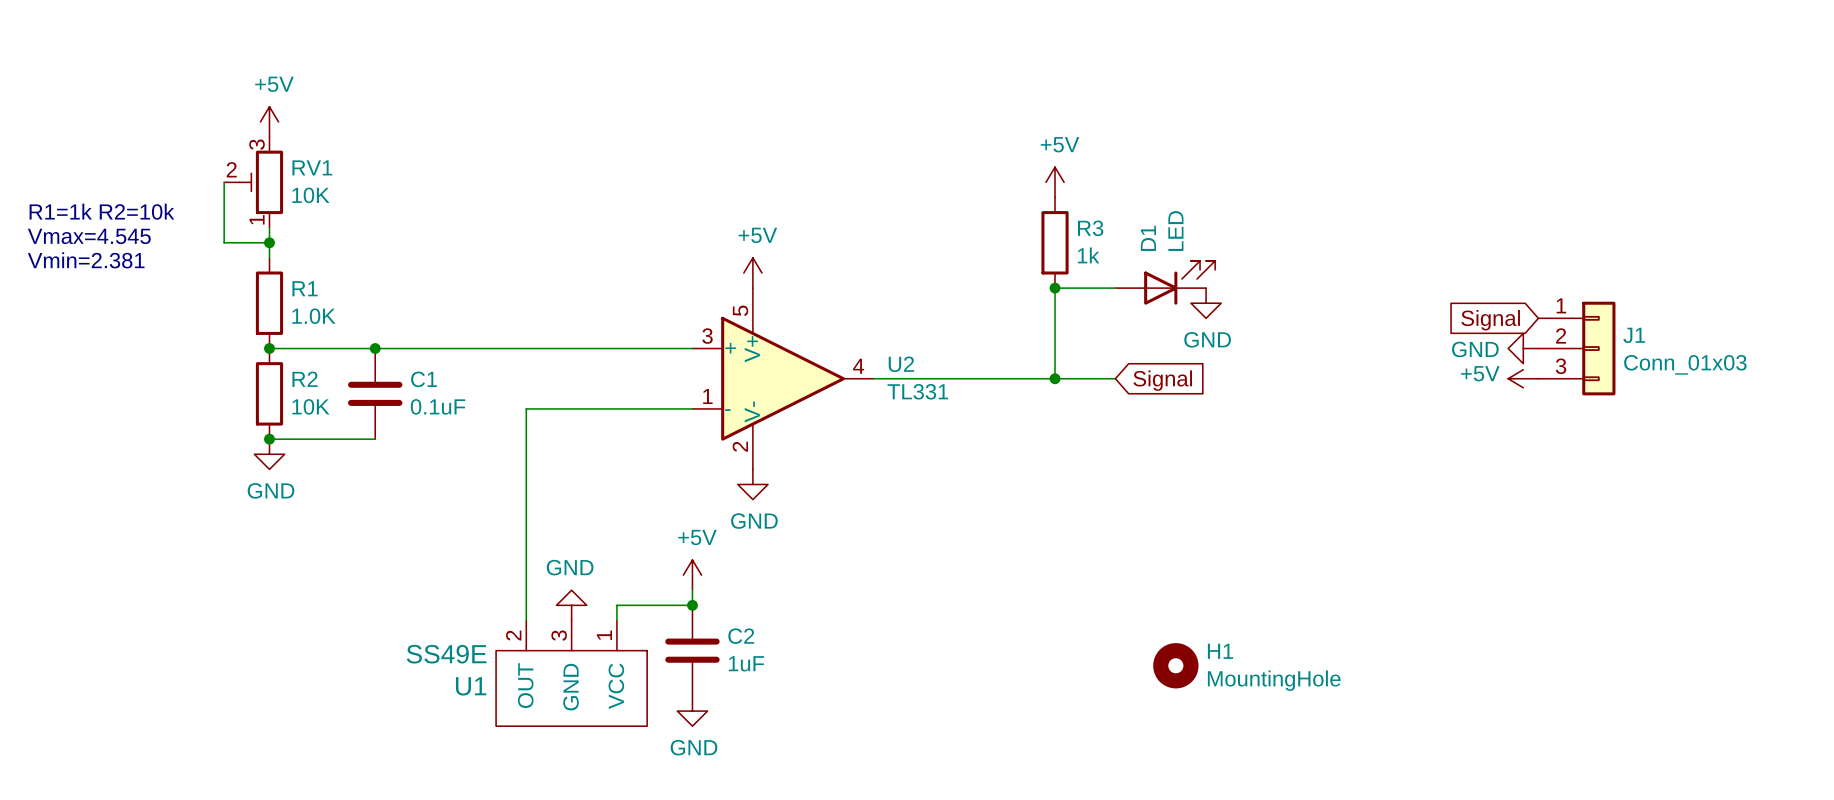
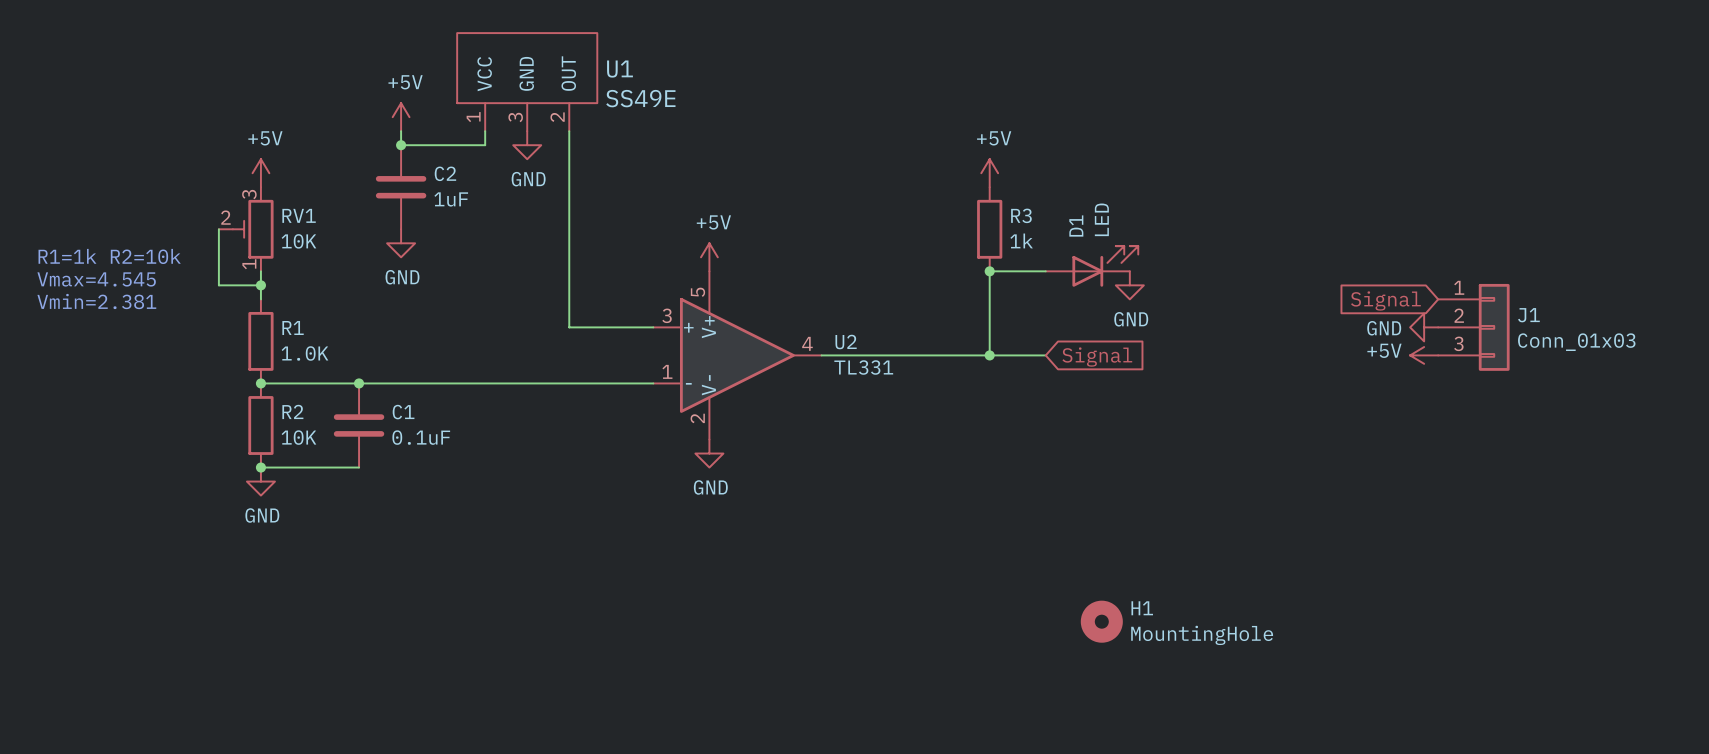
power symbol position: +5V (269, 121) -> +5V (260, 173)
power symbol: none -> +5V (401, 117)
wire: none -> (401, 131) (401, 145) (485, 145) (485, 131)
junction: none -> (401, 145)
power symbol: none -> GND (527, 145)
wire: (224, 182) (224, 242) (269, 242) -> (218, 229) (218, 285) (260, 285)
RV1 position: (253, 182) -> (246, 229)
text position: R1=1k R2=10k (101, 211) -> R1=1k R2=10k (109, 256)
wire: (269, 227) (269, 257) -> (260, 271) (260, 299)
text position: Vmax=4.545 (89, 236) -> Vmax=4.545 (96, 279)
junction: (269, 242) -> none
power symbol: none -> GND (401, 243)
text position: Vmin=2.381 (86, 260) -> Vmin=2.381 (96, 301)
R1 position: (269, 303) -> (260, 341)
junction: none -> (260, 285)
wire: (269, 348) (601, 348) -> (569, 131) (569, 327)
junction: (269, 348) -> none
junction: (375, 348) -> none
R2 position: (269, 393) -> (260, 425)
C1 position: (375, 393) -> (359, 425)
junction: none -> (260, 383)
junction: none -> (359, 383)
wire: (526, 408) (526, 620) -> (499, 383) (260, 383)
wire: (269, 439) (375, 439) -> (260, 467) (359, 467)
junction: (269, 439) -> none
power symbol position: GND (269, 454) -> GND (260, 481)
junction: none -> (260, 467)
power symbol: +5V (692, 575) -> none
wire: (692, 590) (692, 605) (616, 605) (616, 620) -> none
power symbol: GND (571, 605) -> none
junction: (692, 605) -> none
C2 position: (692, 650) -> (401, 187)
U1 position: (571, 673) -> (527, 82)
U1 rotation: 0° (571, 688) -> 180° (527, 68)
power symbol: GND (692, 711) -> none

